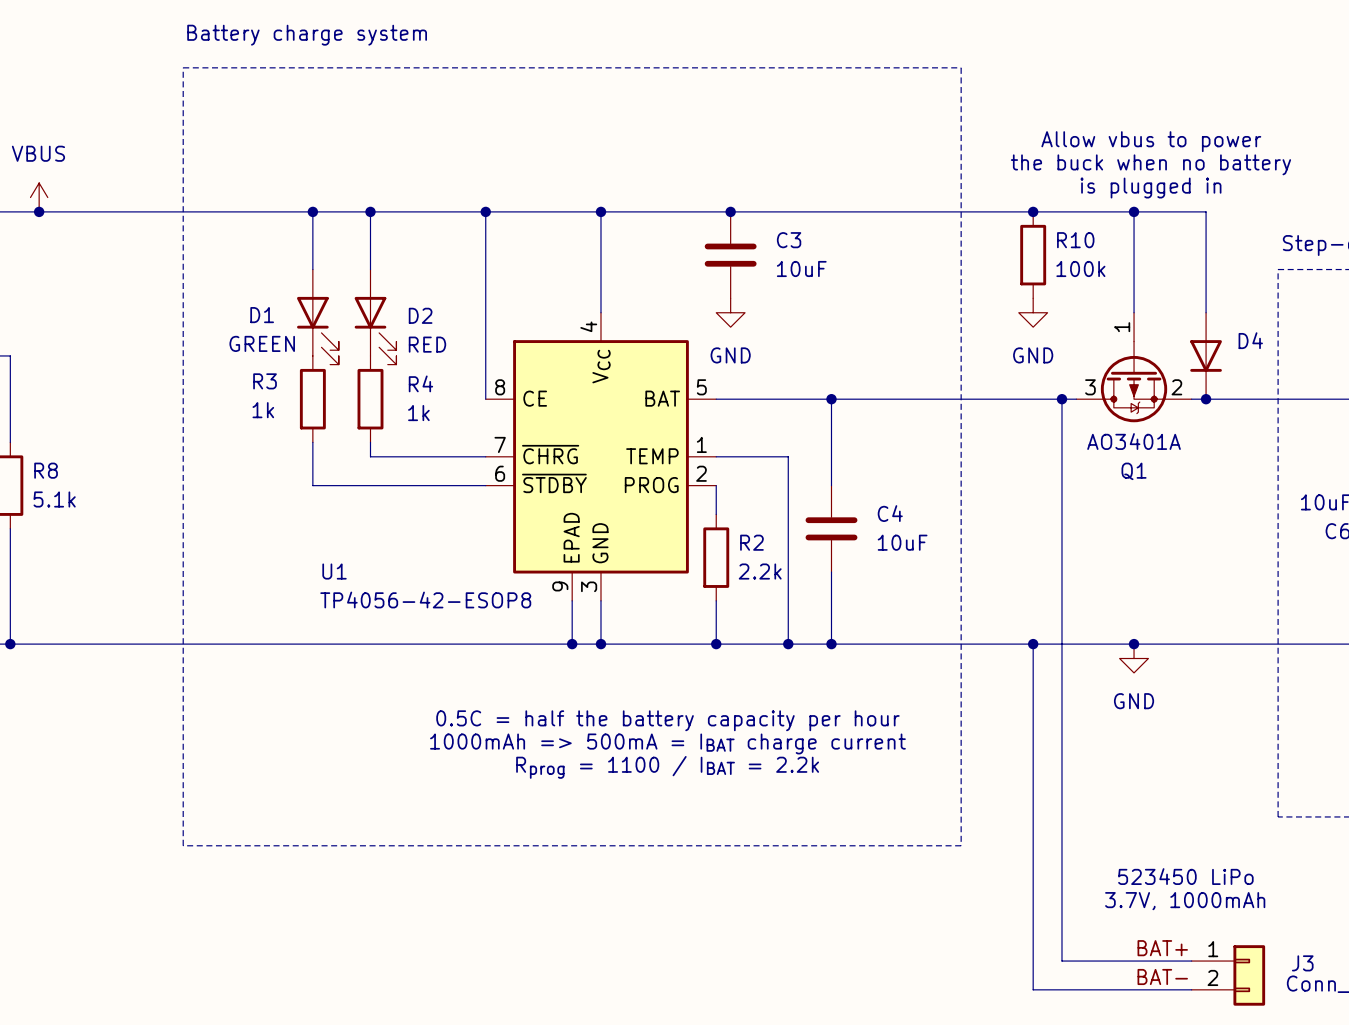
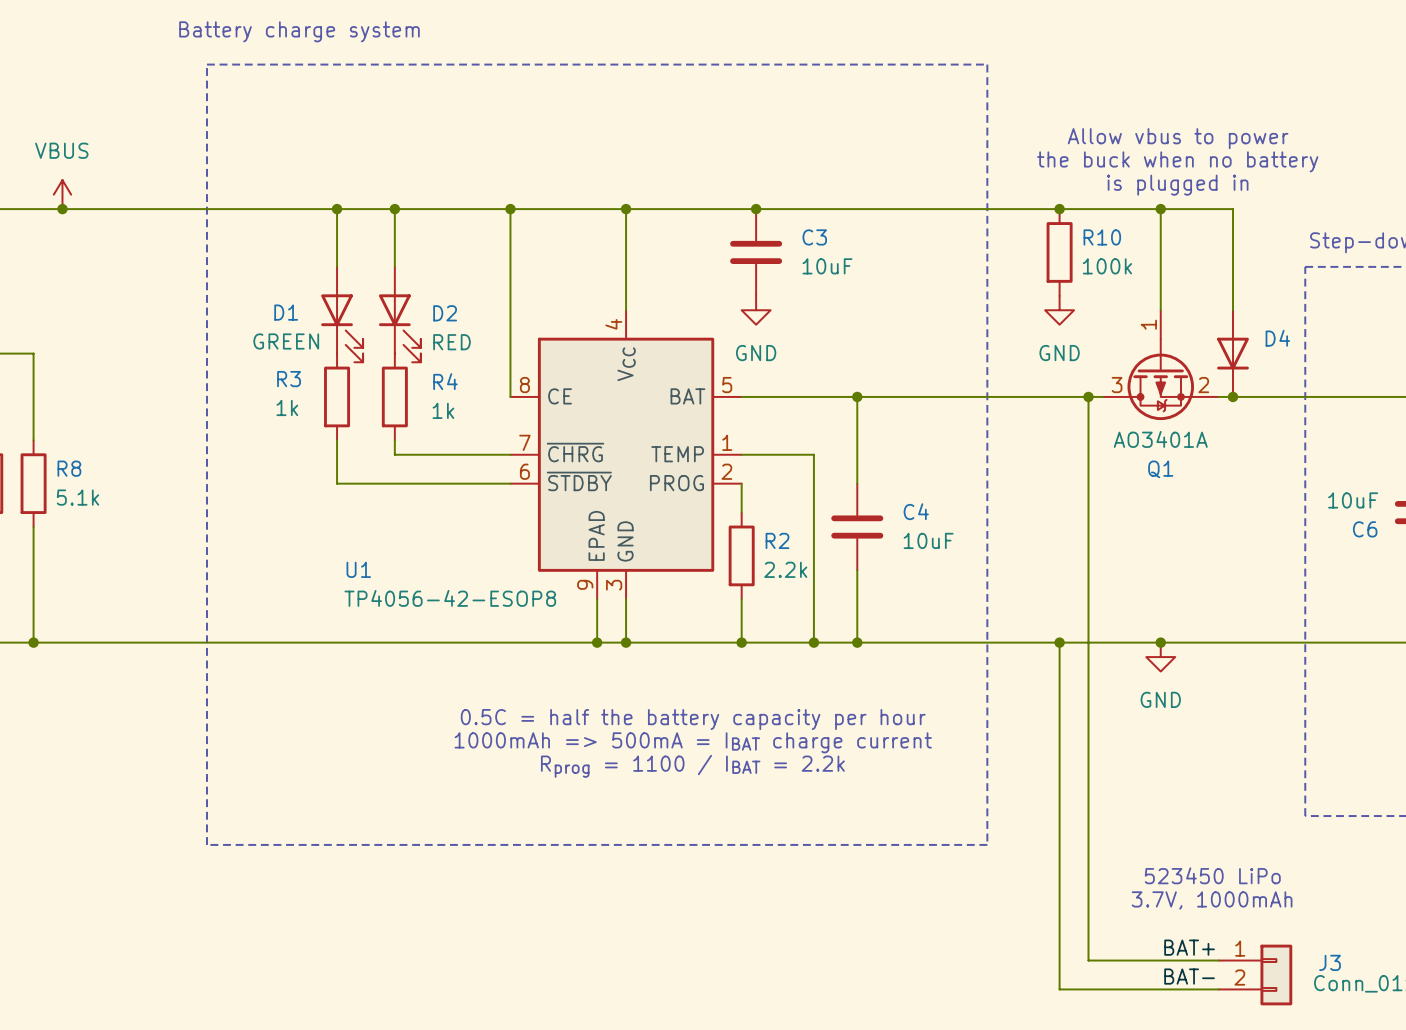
text position: Battery charge system (307, 35) -> Battery charge system (299, 31)

